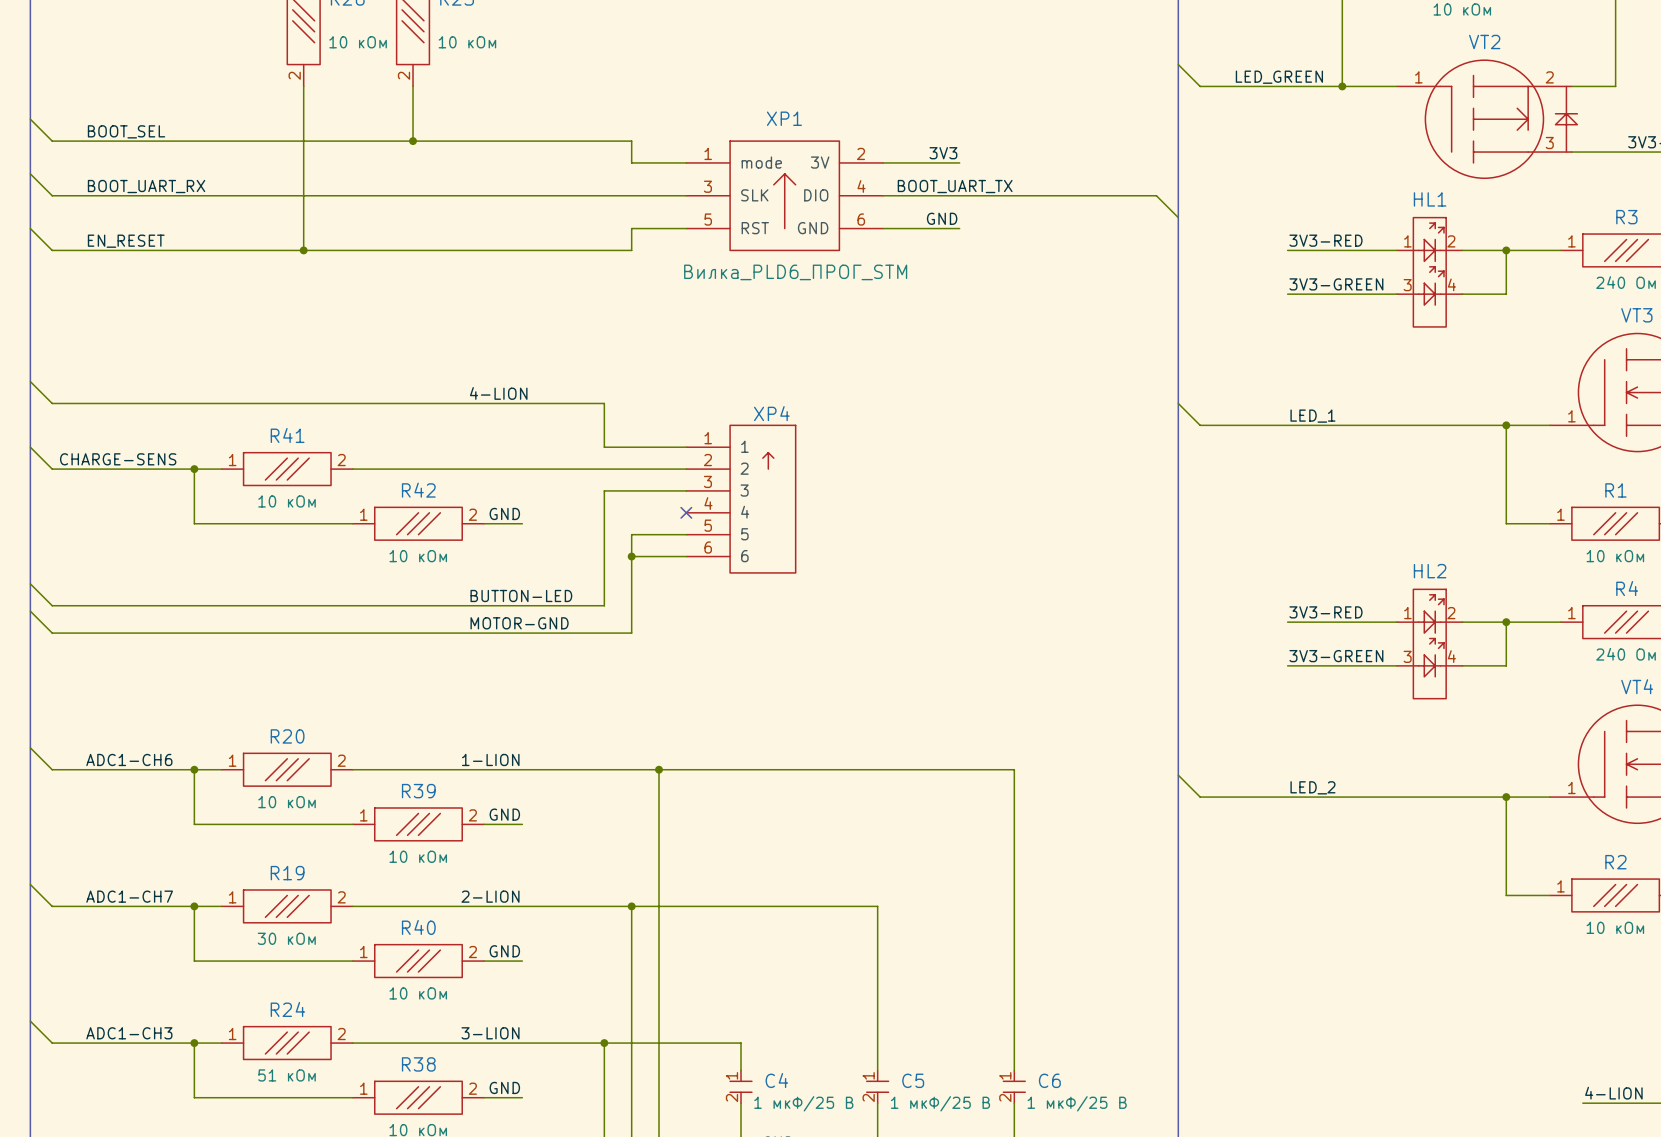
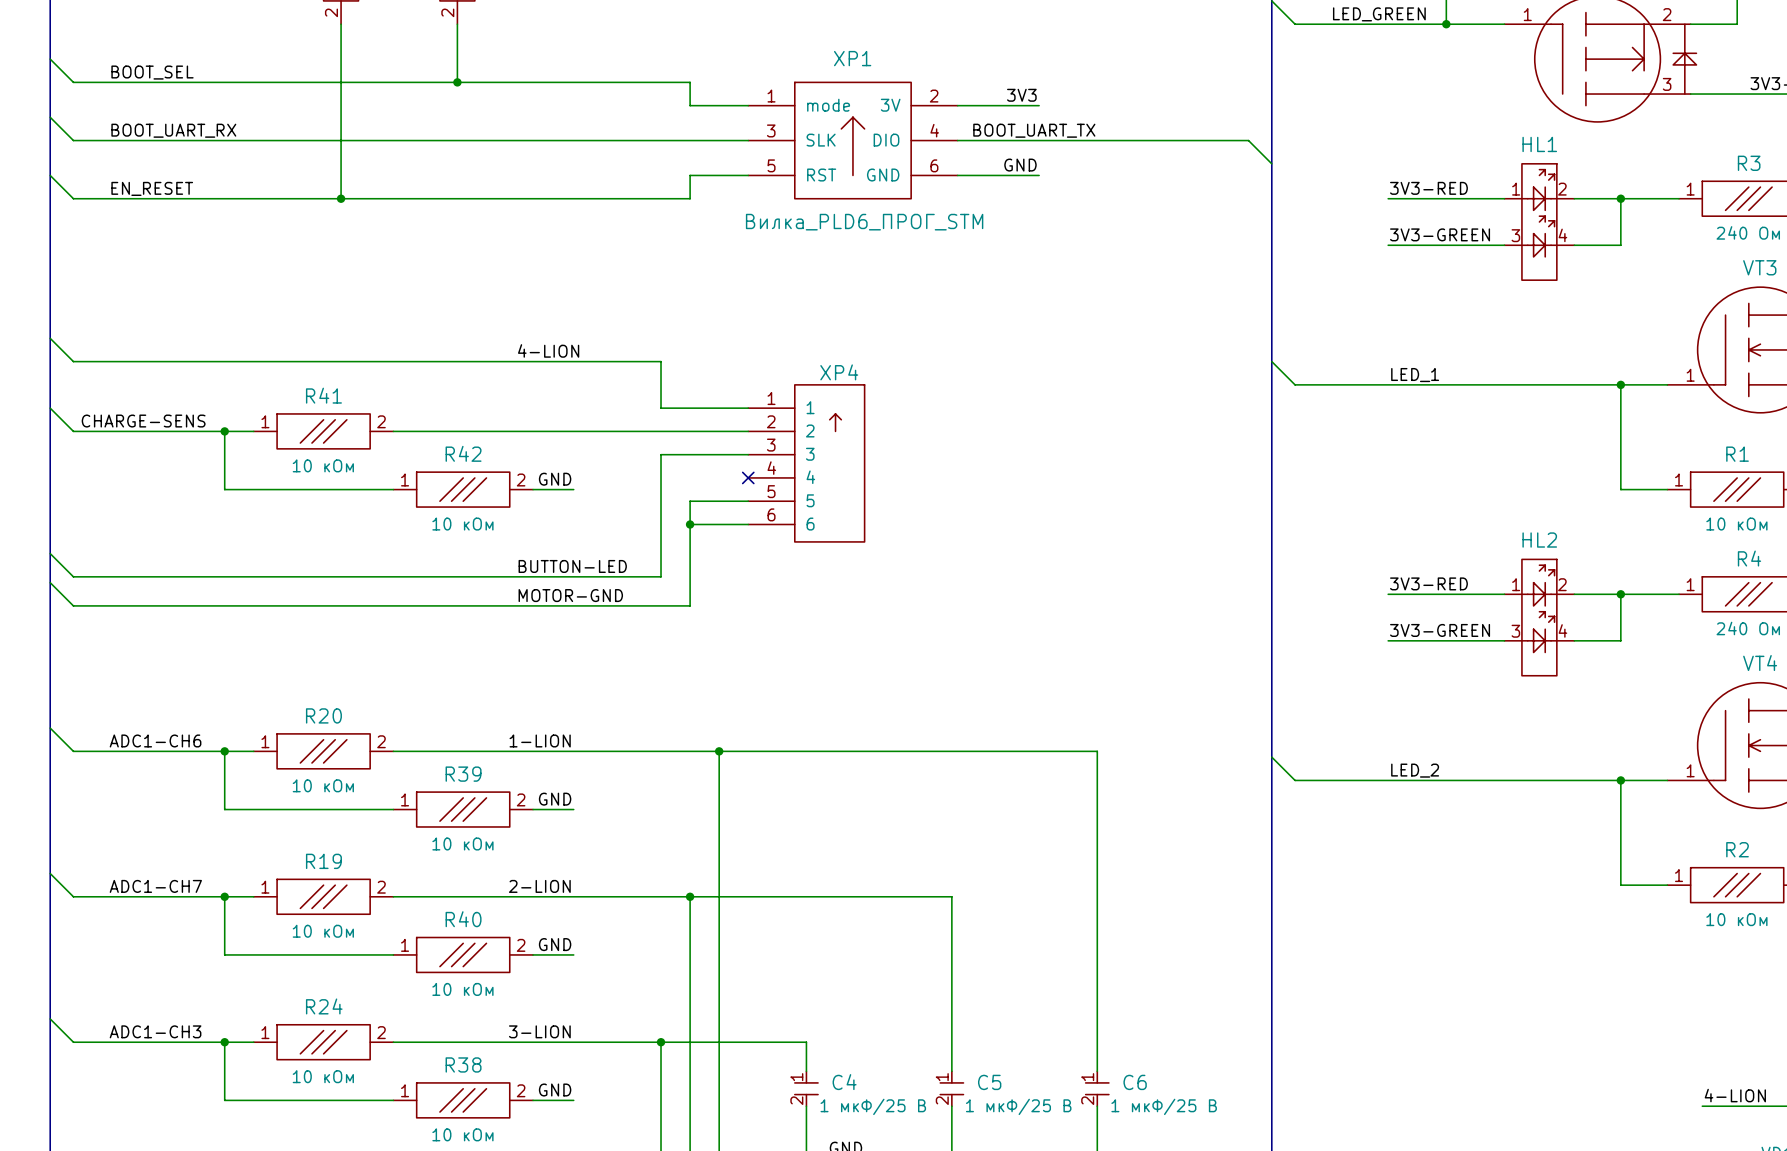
R19 text: 30 кОм (286, 938) -> 10 кОм (323, 931)
R24 text: 51 кОм (287, 1075) -> 10 кОм (323, 1076)

